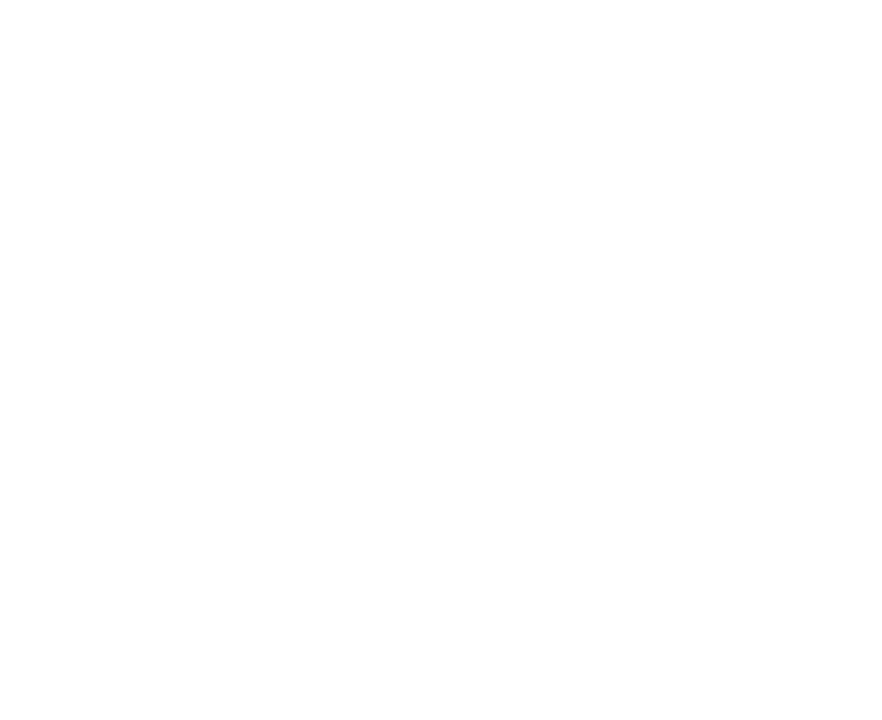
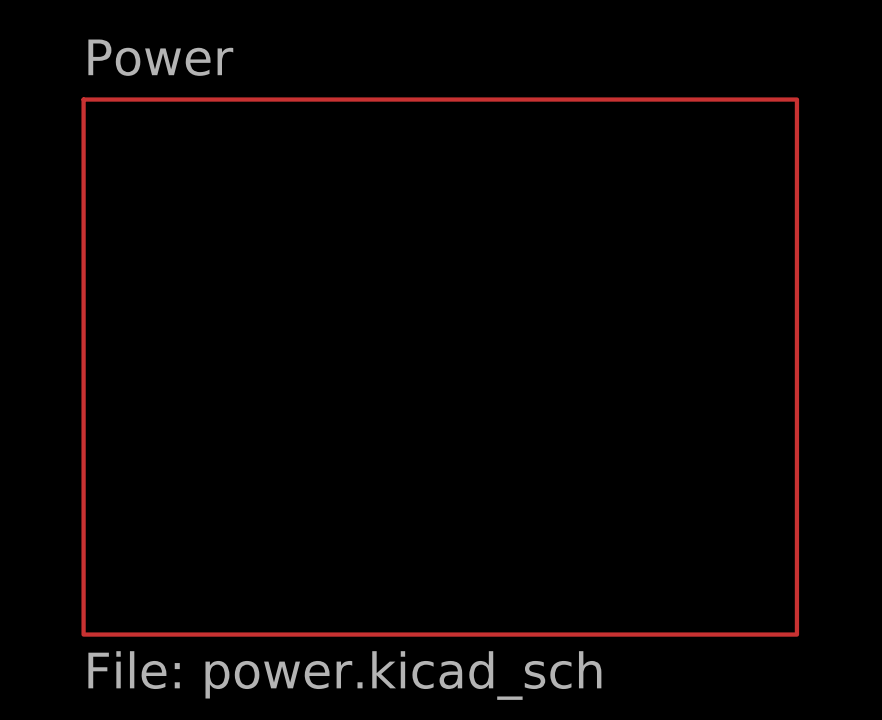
sheet Power: none -> File: power.kicad_sch (440, 367)

